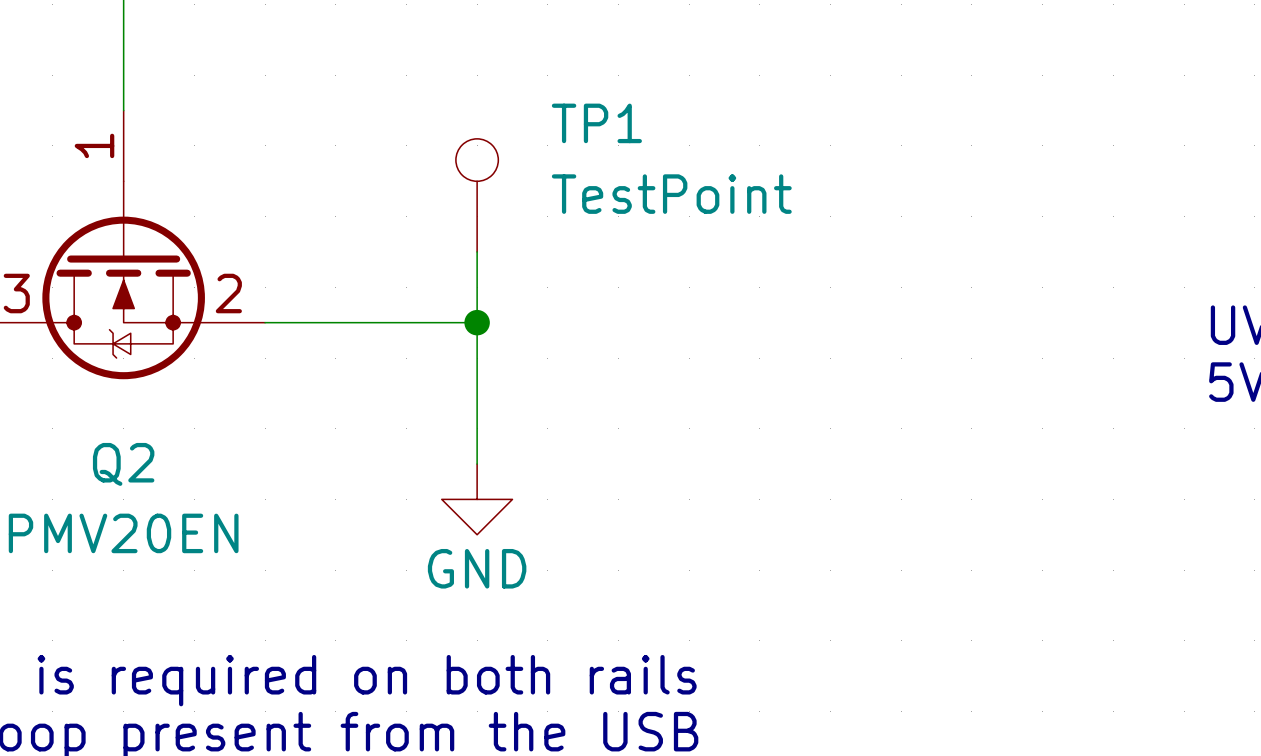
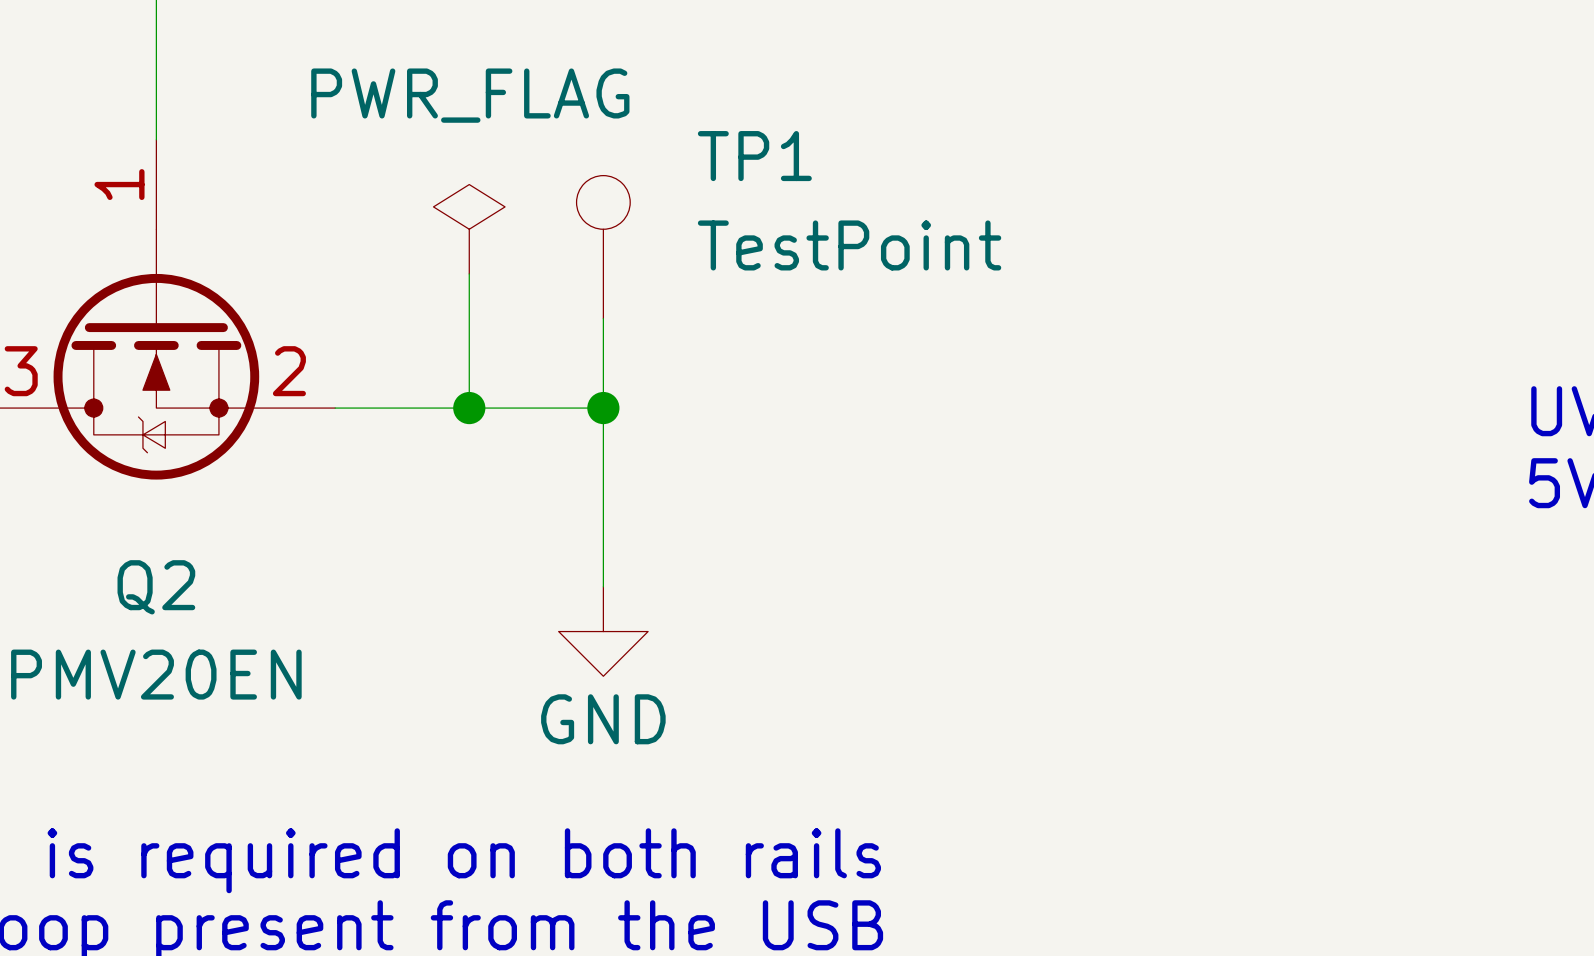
power symbol: none -> PWR_FLAG (469, 229)
wire: none -> (469, 273) (469, 408)
junction: none -> (469, 408)

